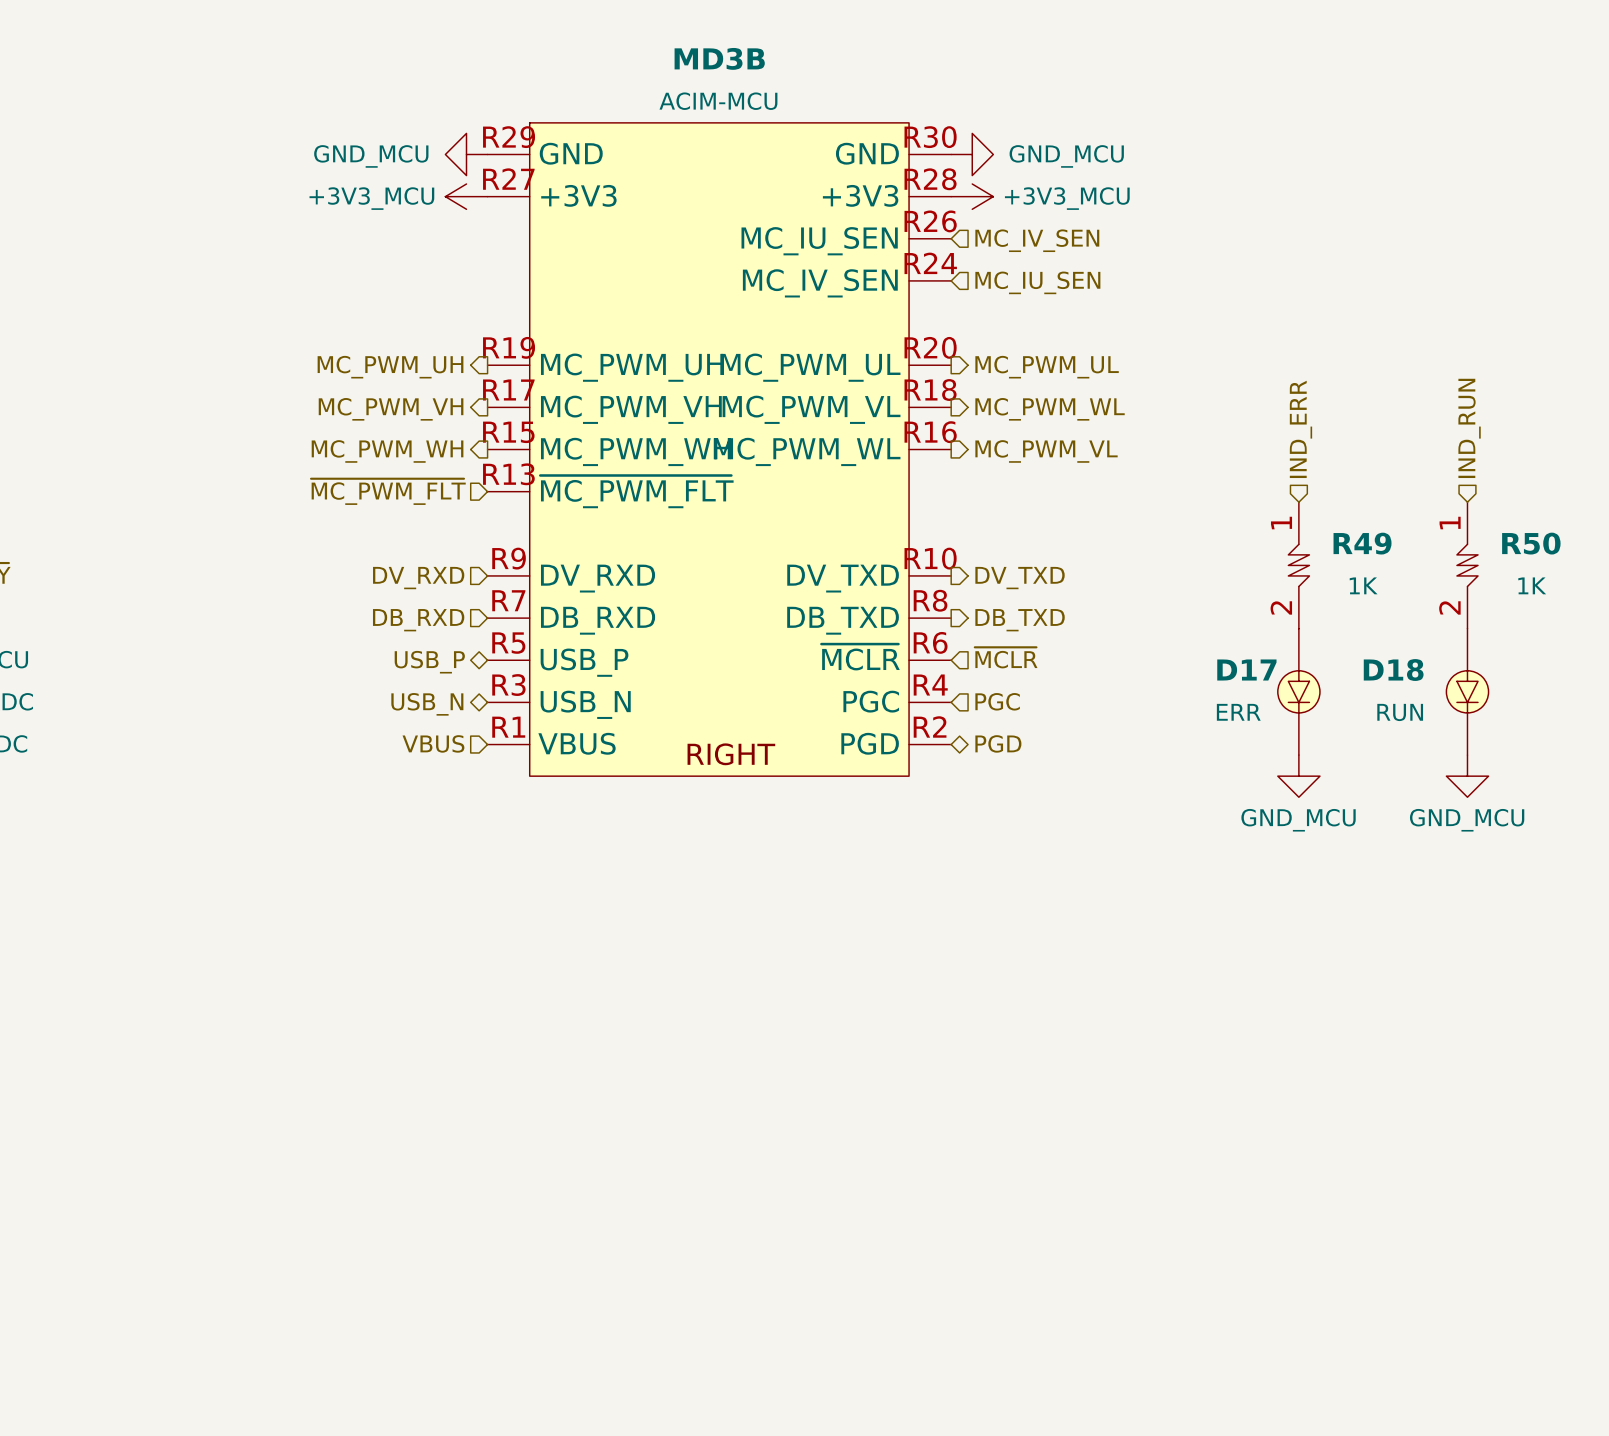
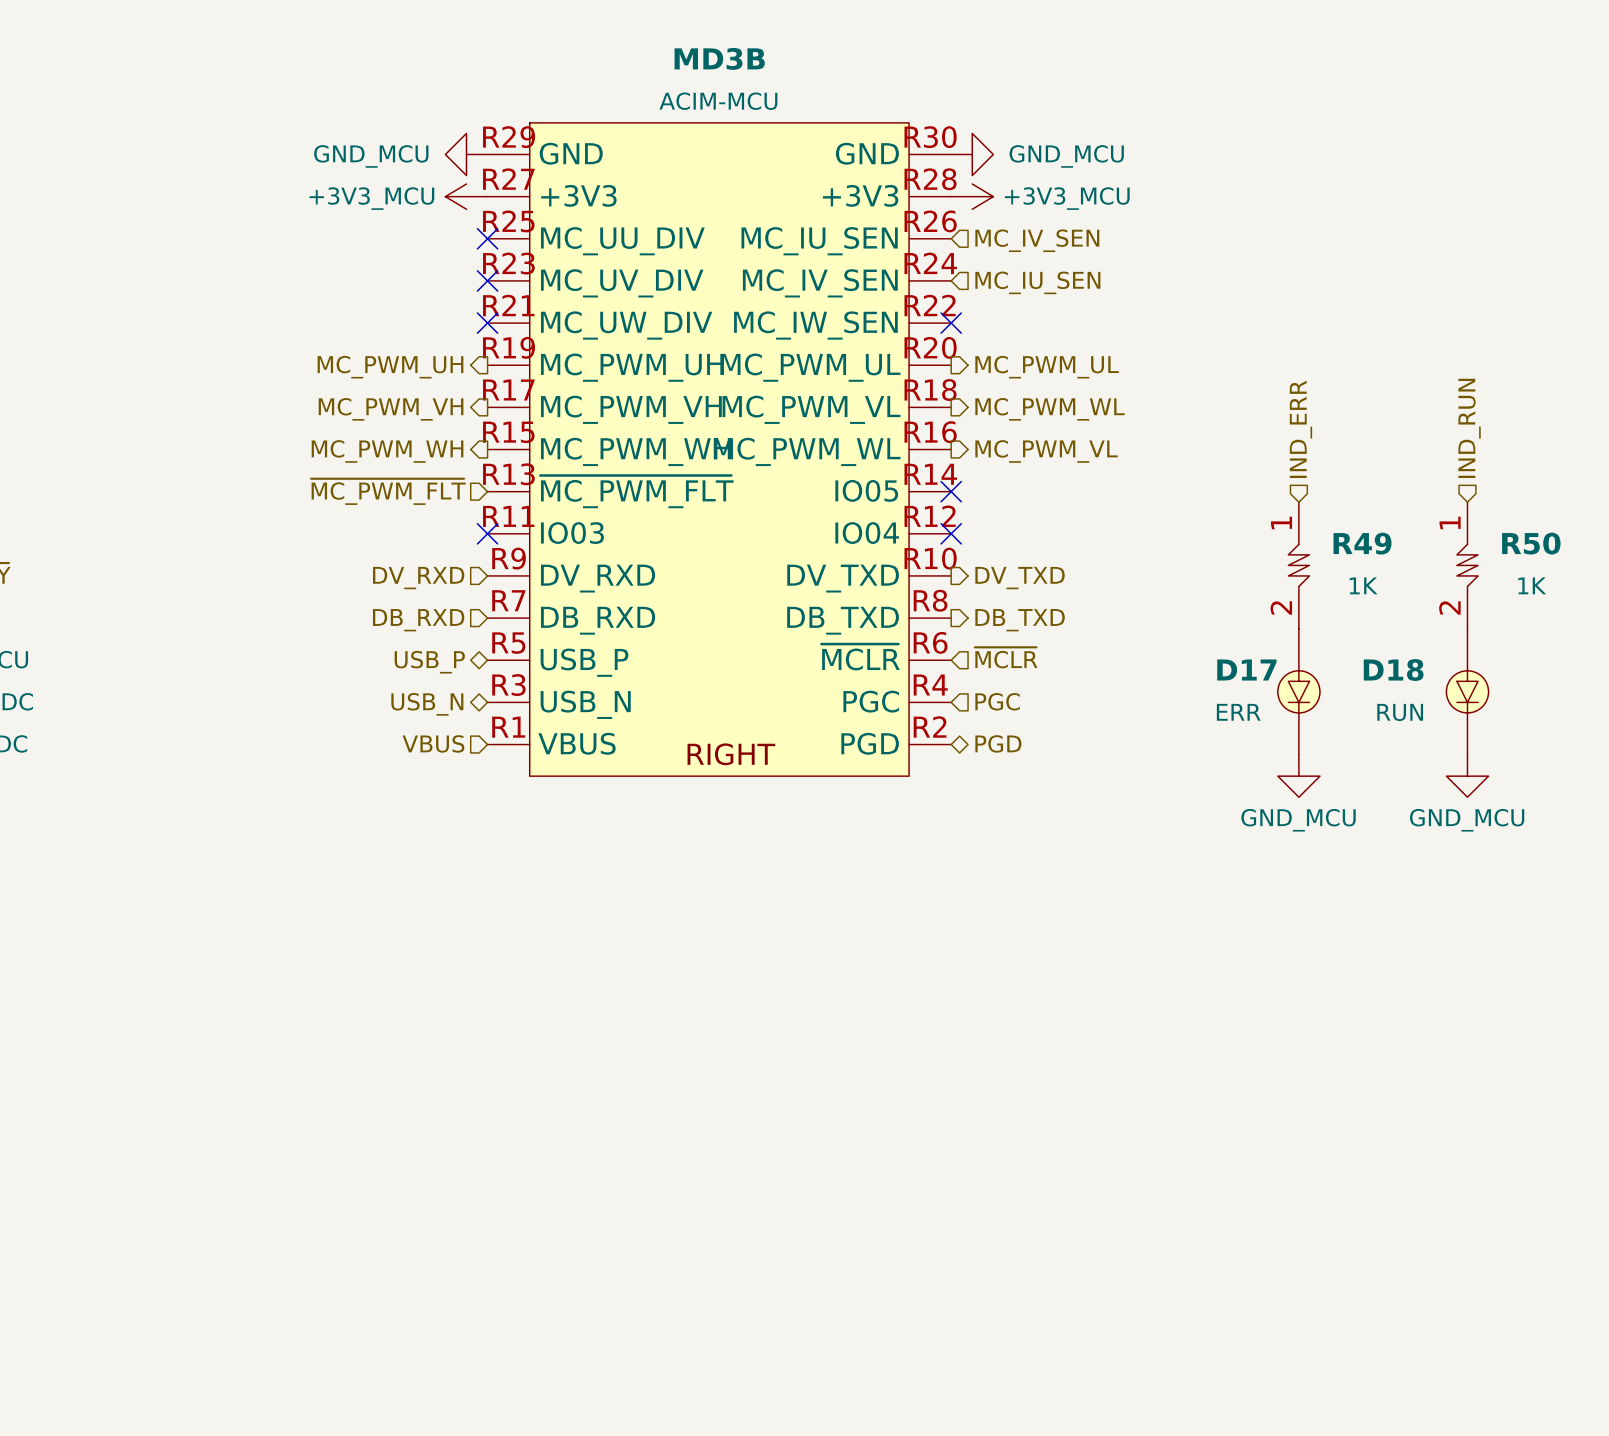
MD3B symbol: [487, 122, 952, 777] -> [487, 122, 952, 777]
no-connect mark: none -> (487, 238)
no-connect mark: none -> (487, 280)
no-connect mark: none -> (487, 323)
no-connect mark: none -> (951, 323)
no-connect mark: none -> (951, 491)
no-connect mark: none -> (487, 533)
no-connect mark: none -> (951, 533)

